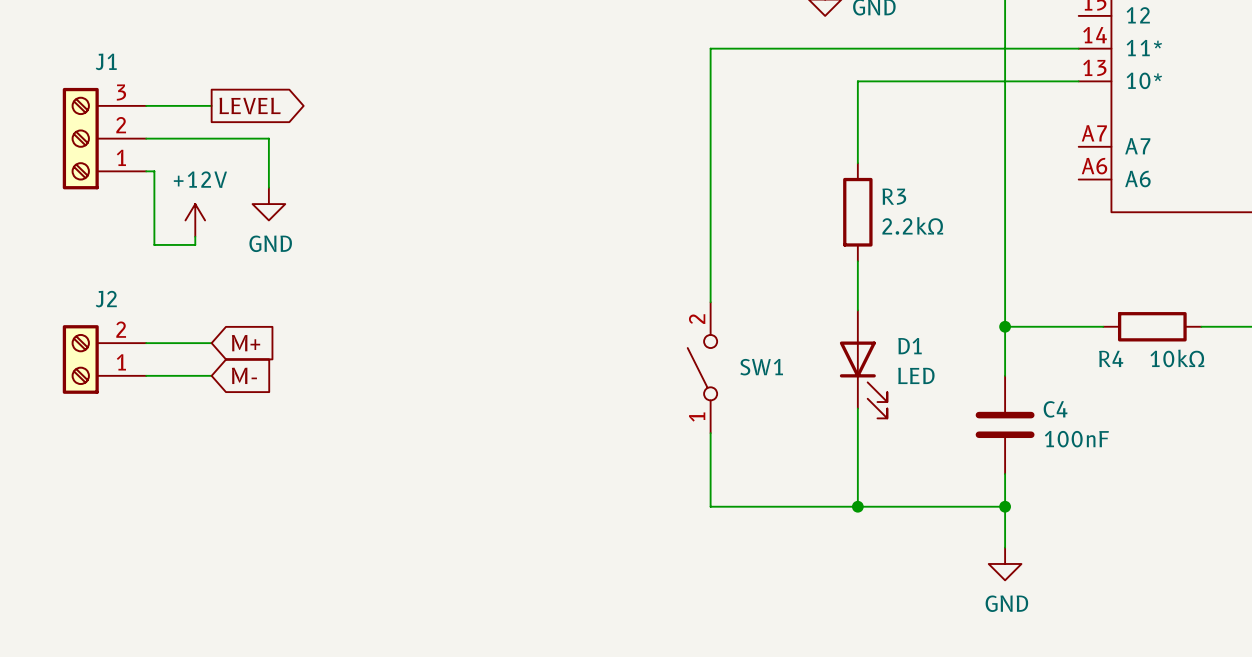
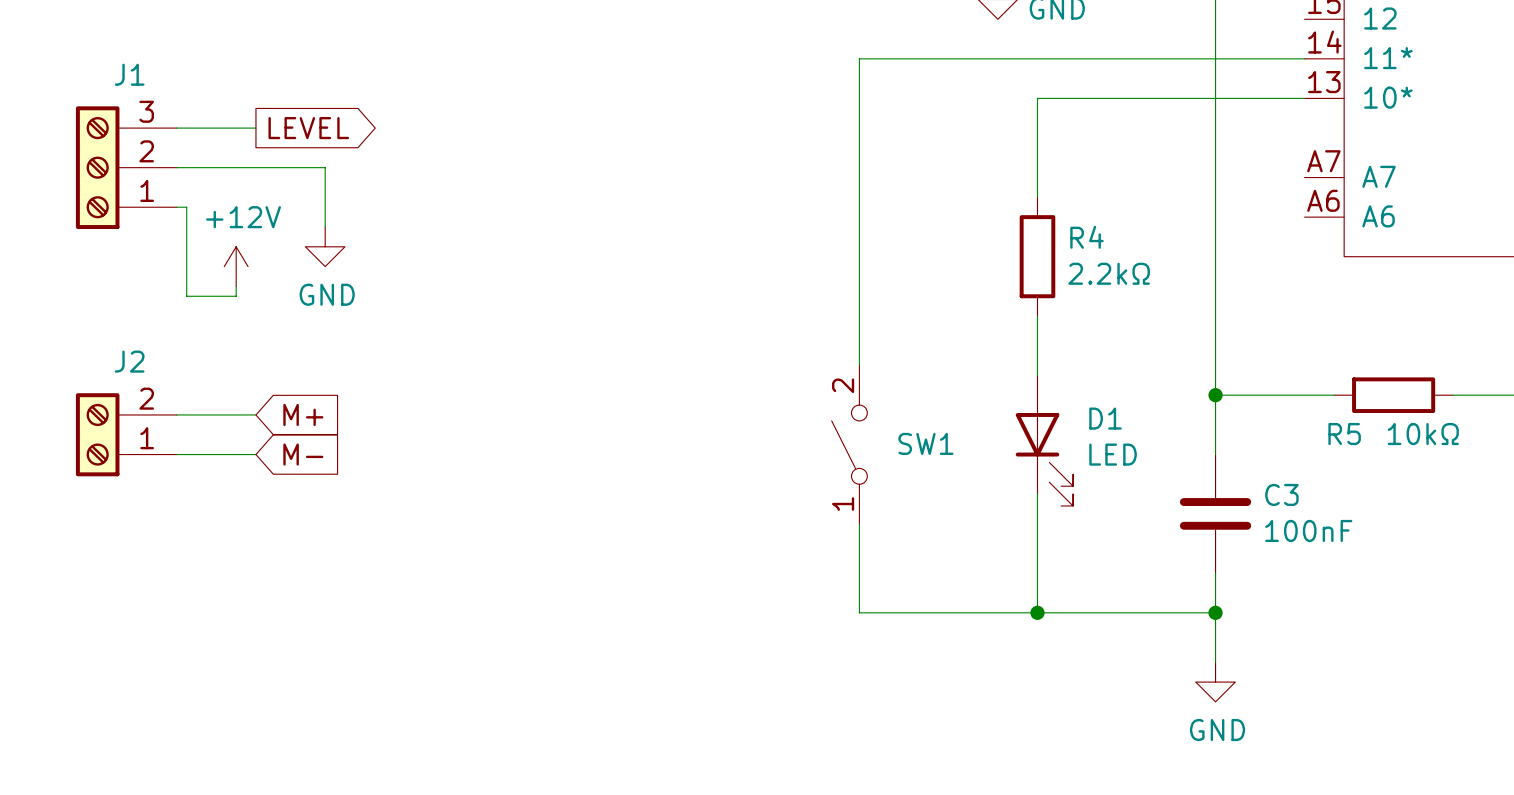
R3 name: R3 (894, 196) -> R4 (1087, 237)
R4 name: R4 (1111, 358) -> R5 (1344, 434)
C4 name: C4 (1055, 409) -> C3 (1281, 494)

